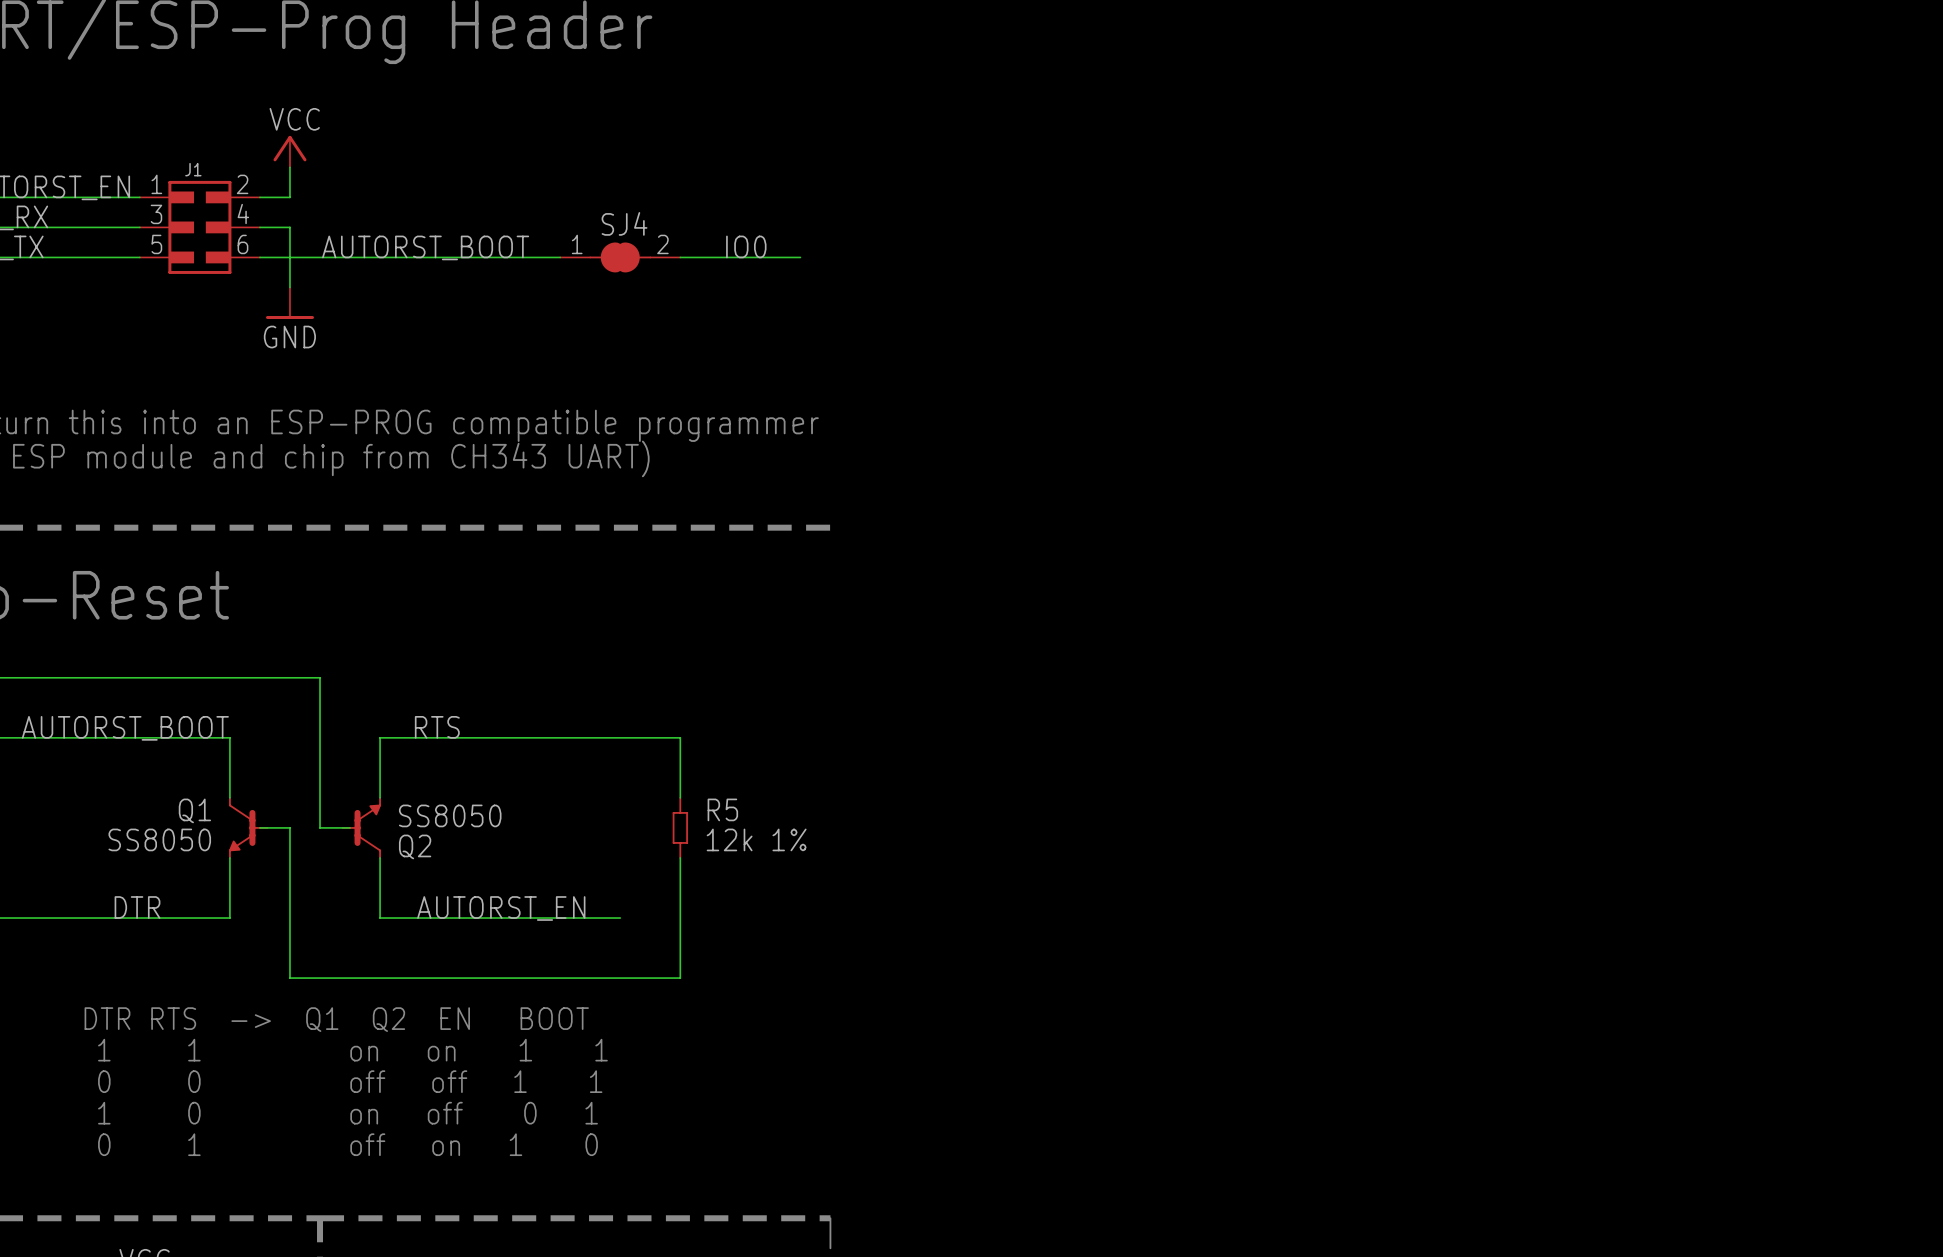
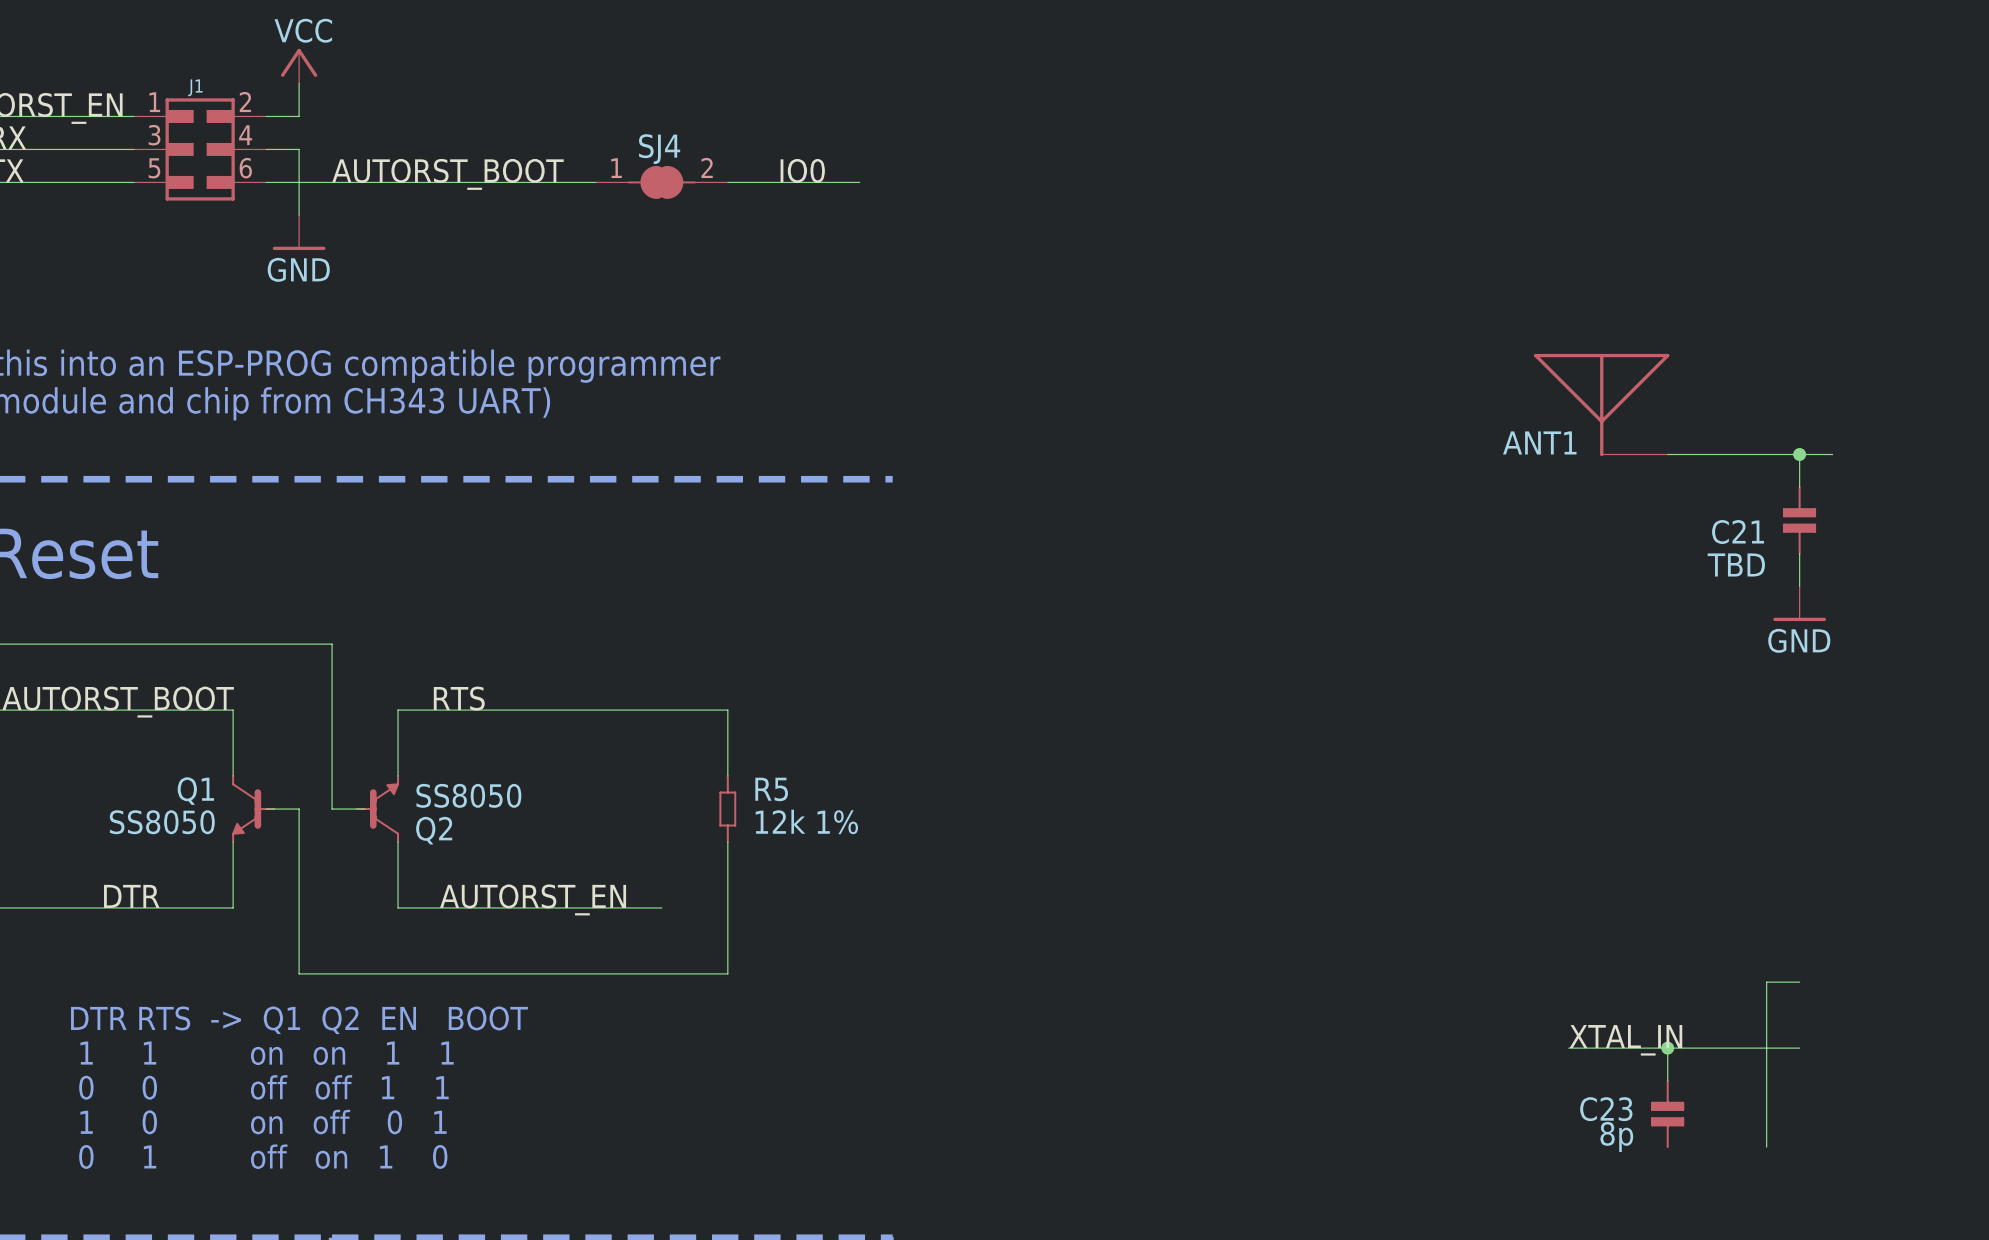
part: none -> (1601, 405)
text: none -> ANT1 (1539, 442)
wire: none -> (1667, 454) (1832, 454)
wire: none -> (1799, 454) (1799, 487)
junction: none -> (1799, 454)
C21: none -> TBD (1799, 520)
wire: none -> (1799, 553) (1799, 586)
power symbol: none -> GND (1799, 603)
wire: none -> (1799, 982) (1766, 982) (1766, 1147)
label: none -> XTAL_IN (1625, 1040)
wire: none -> (1568, 1048) (1799, 1048)
wire: none -> (1667, 1048) (1667, 1081)
junction: none -> (1667, 1048)
C23: none -> 8p (1667, 1114)

